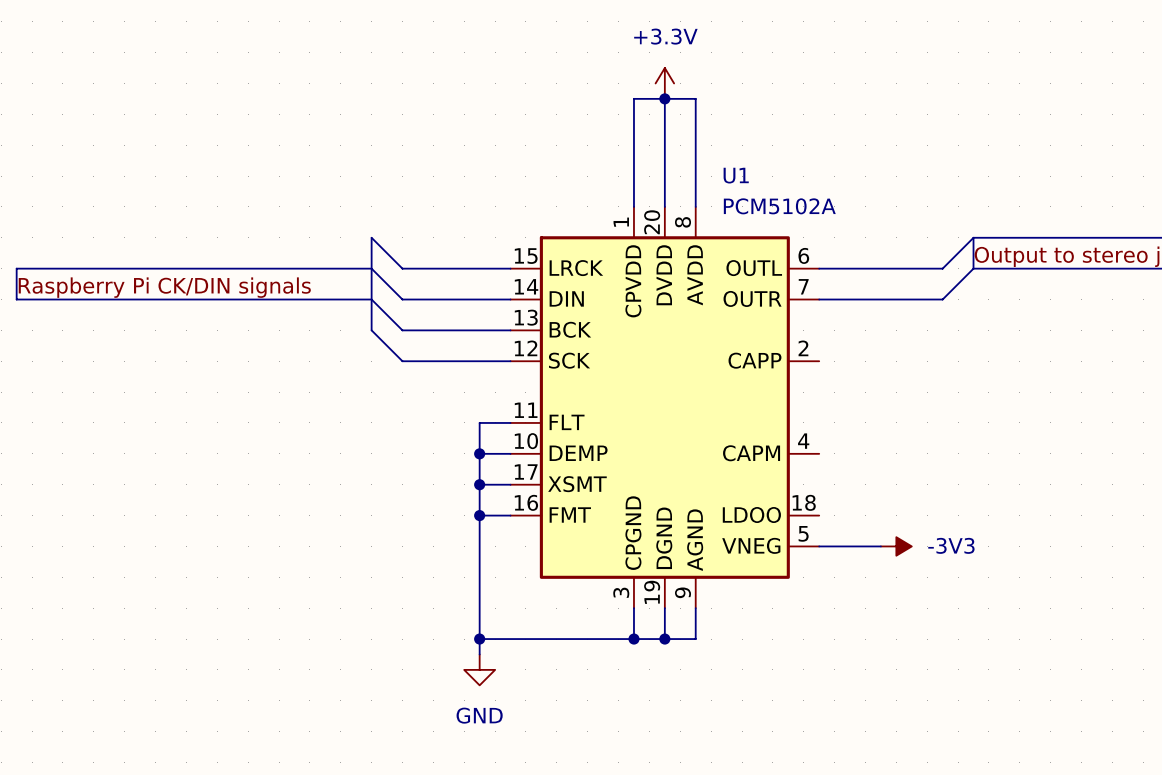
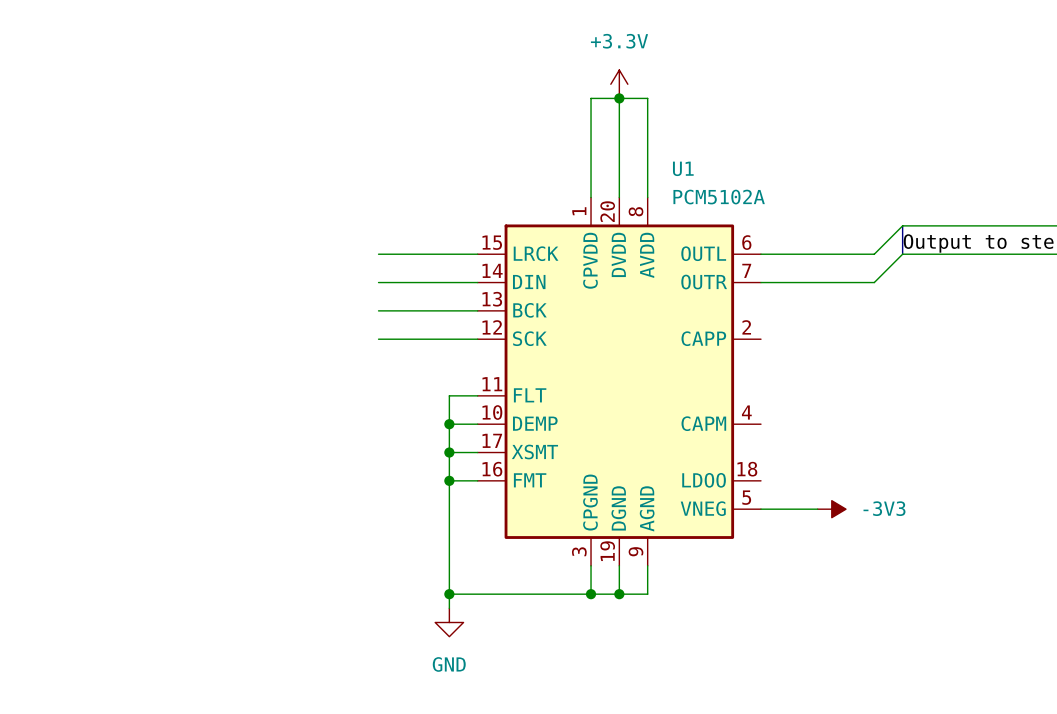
wire: (371, 237) (402, 268) -> none
bus: (371, 237) (371, 330) -> none
label: Raspberry Pi CK/DIN signals (164, 287) -> none
wire: (402, 299) (371, 268) (16, 268) (16, 299) (371, 299) (402, 330) -> none
wire: (371, 330) (402, 361) -> none

